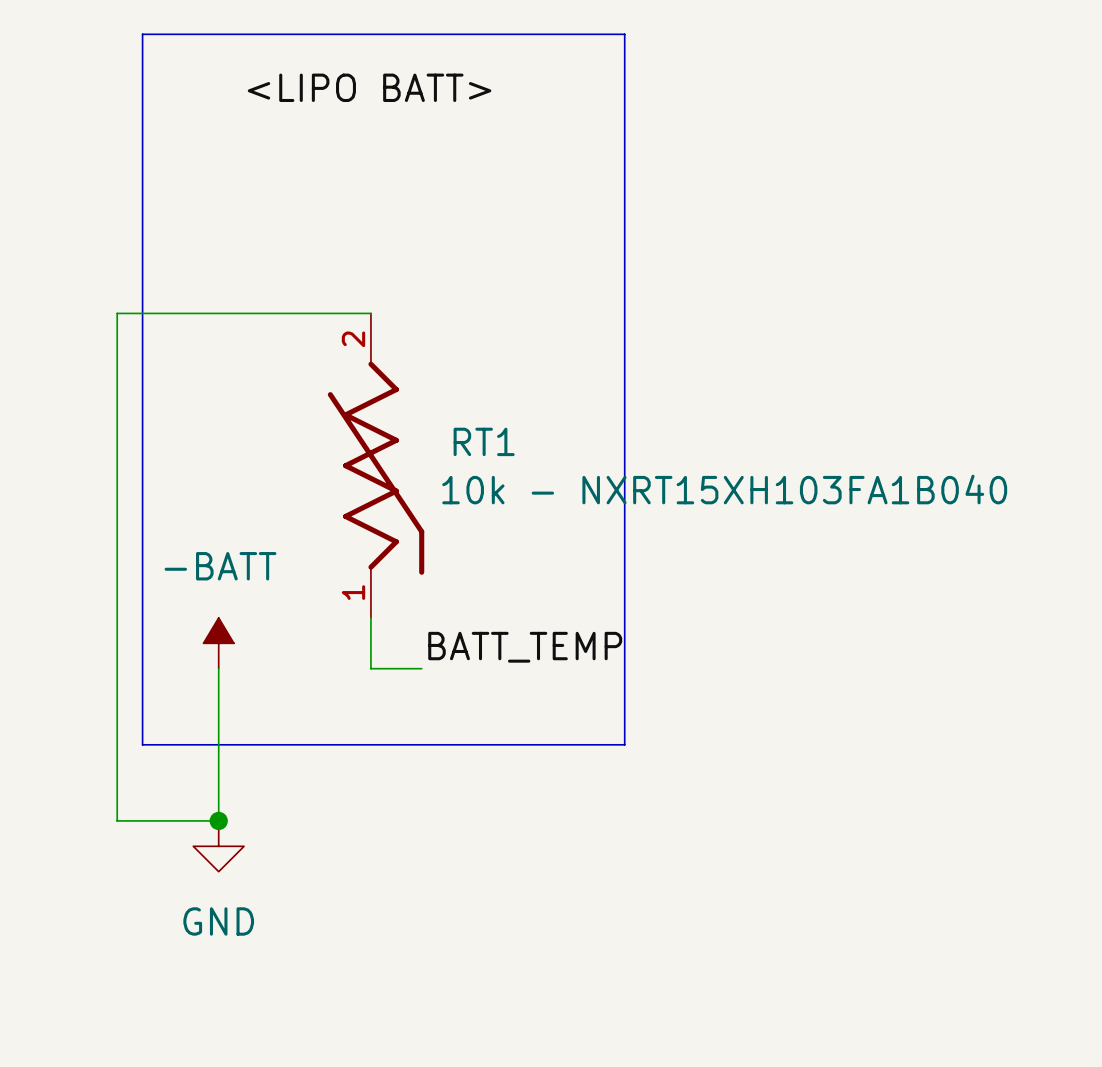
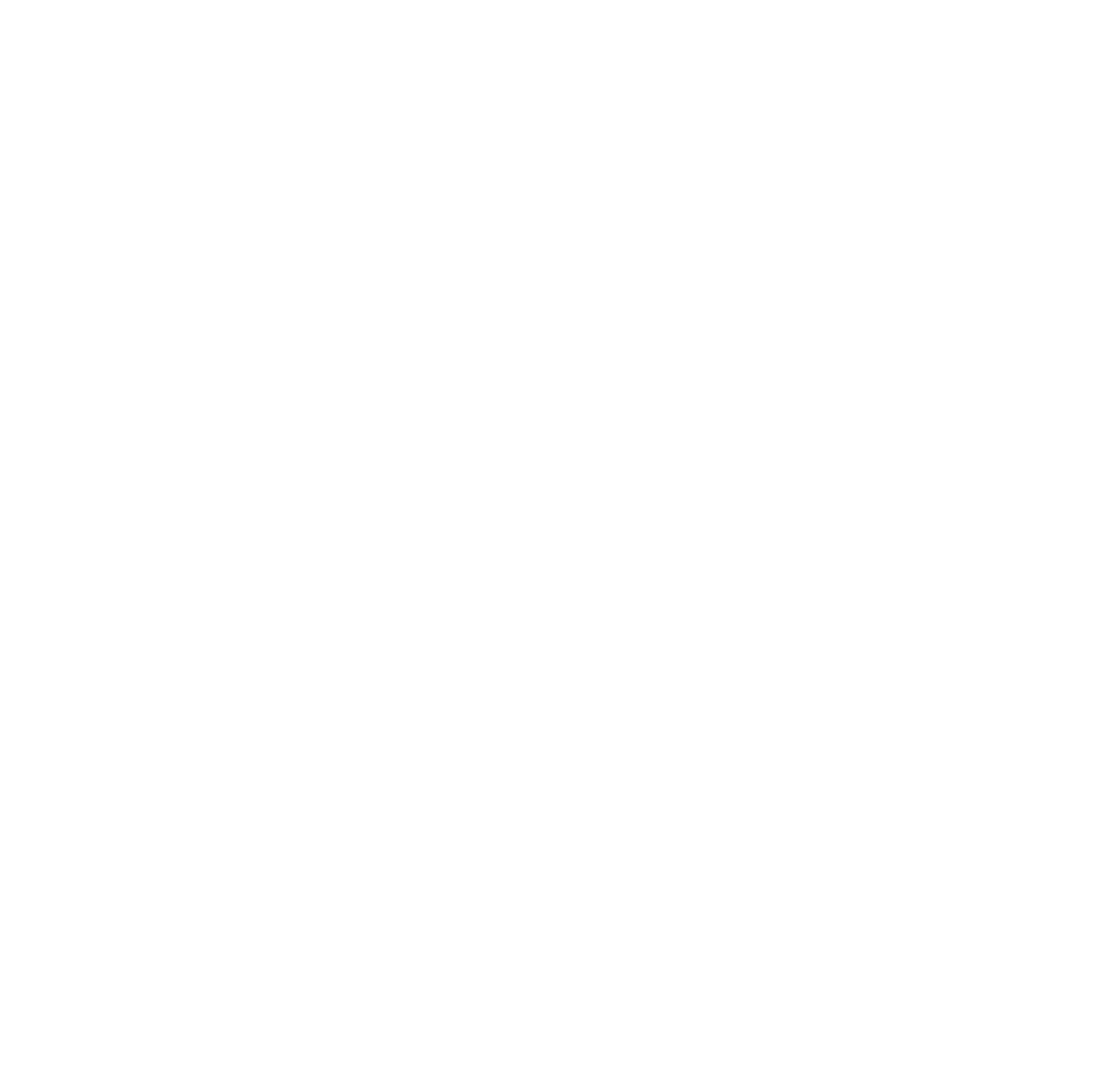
line: (142, 34) (624, 34) (624, 744) (142, 744) (142, 34) -> none
label: <LIPO BATT> (369, 87) -> none
wire: (370, 313) (117, 313) (117, 820) (218, 820) (218, 668) -> none
RT1: 10k - NXRT15XH103FA1B040 (376, 465) -> none
wire: (370, 617) (370, 668) (421, 668) -> none
power symbol: -BATT (218, 643) -> none
label: BATT_TEMP (525, 647) -> none
junction: (218, 820) -> none
power symbol: GND (218, 846) -> none

